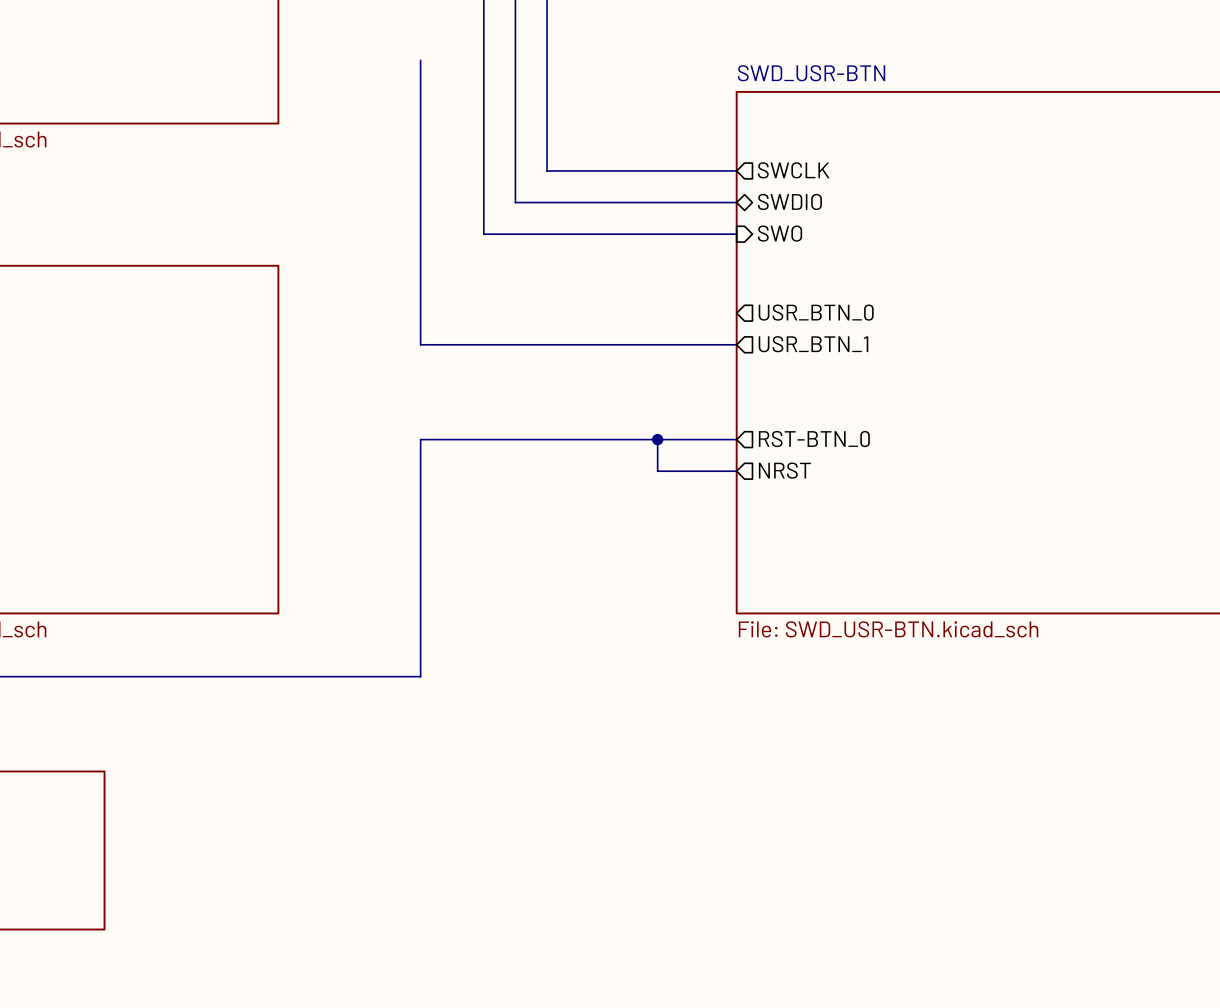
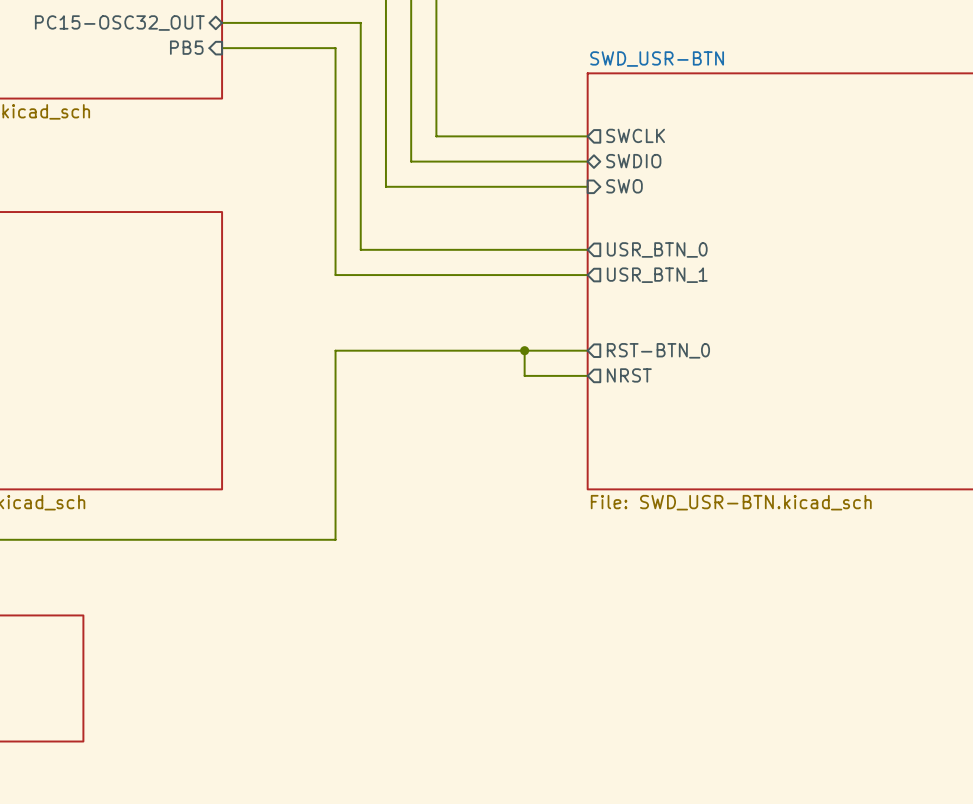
sheet pin: none -> PC15-OSC32_OUT (119, 23)
wire: none -> (222, 22) (360, 22) (360, 249) (587, 249)
sheet pin: none -> PB5 (186, 47)
wire: none -> (222, 48) (335, 48)

